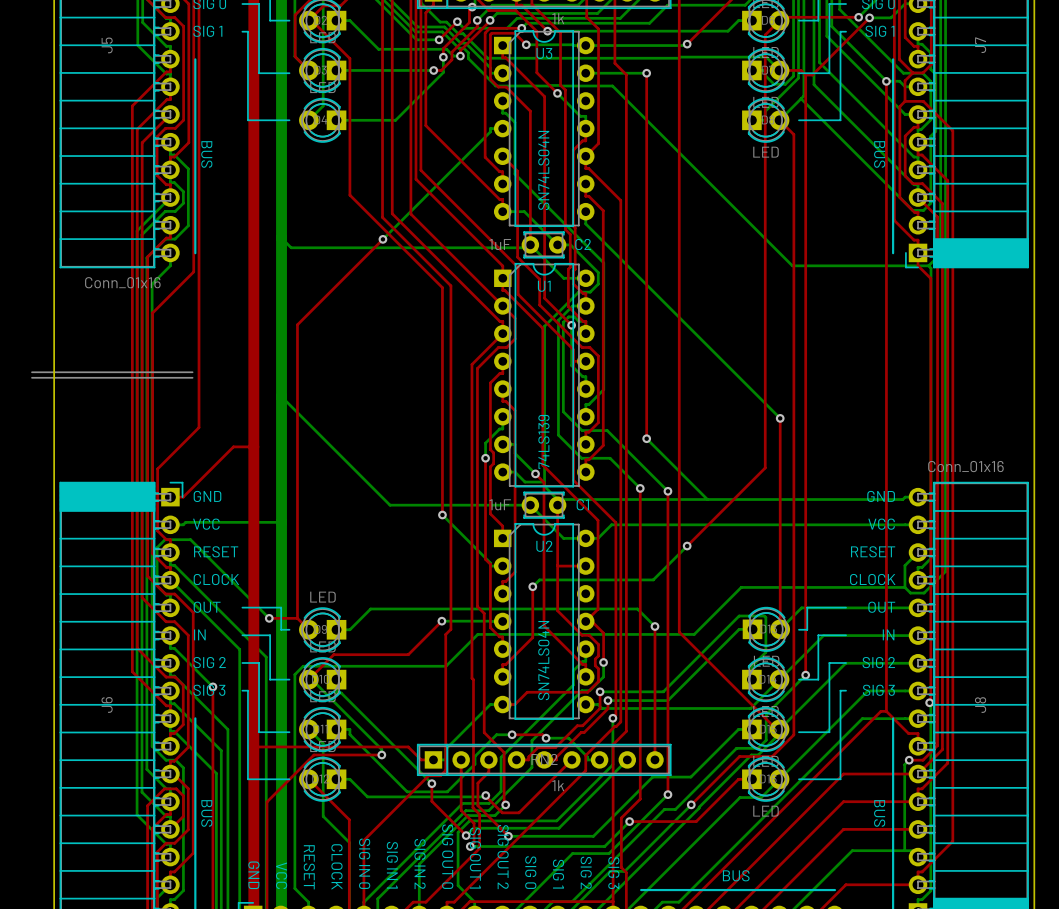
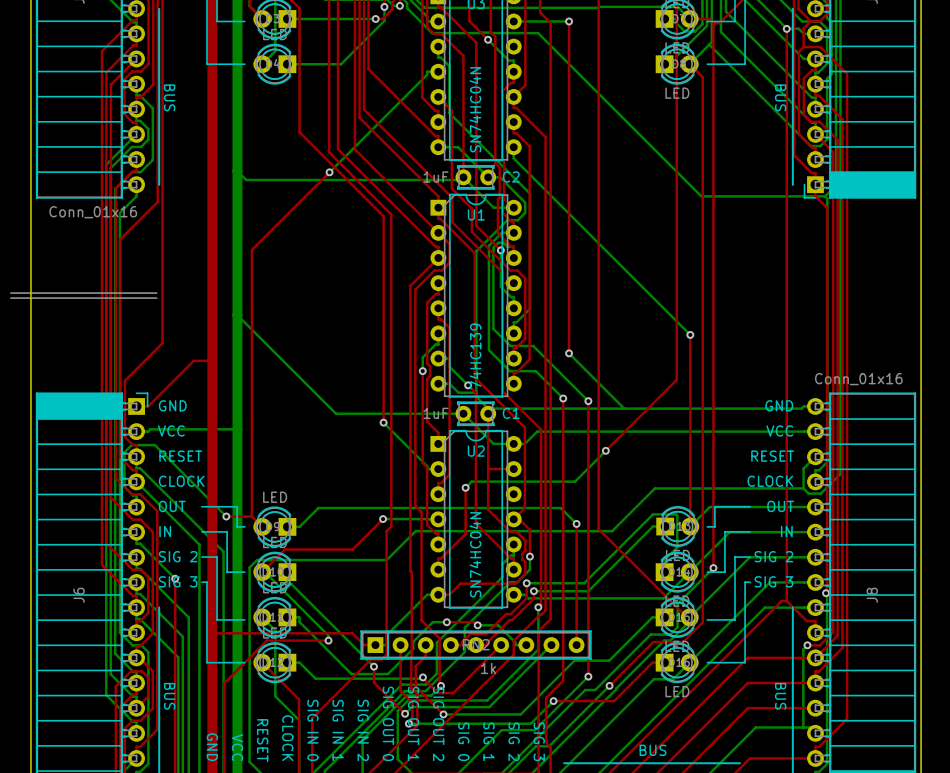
U3 value: SN74LS04N (543, 170) -> SN74HC04N (475, 109)
U1 value: 74LS139 (543, 441) -> 74HC139 (475, 356)
U2 value: SN74LS04N (543, 660) -> SN74HC04N (475, 554)

